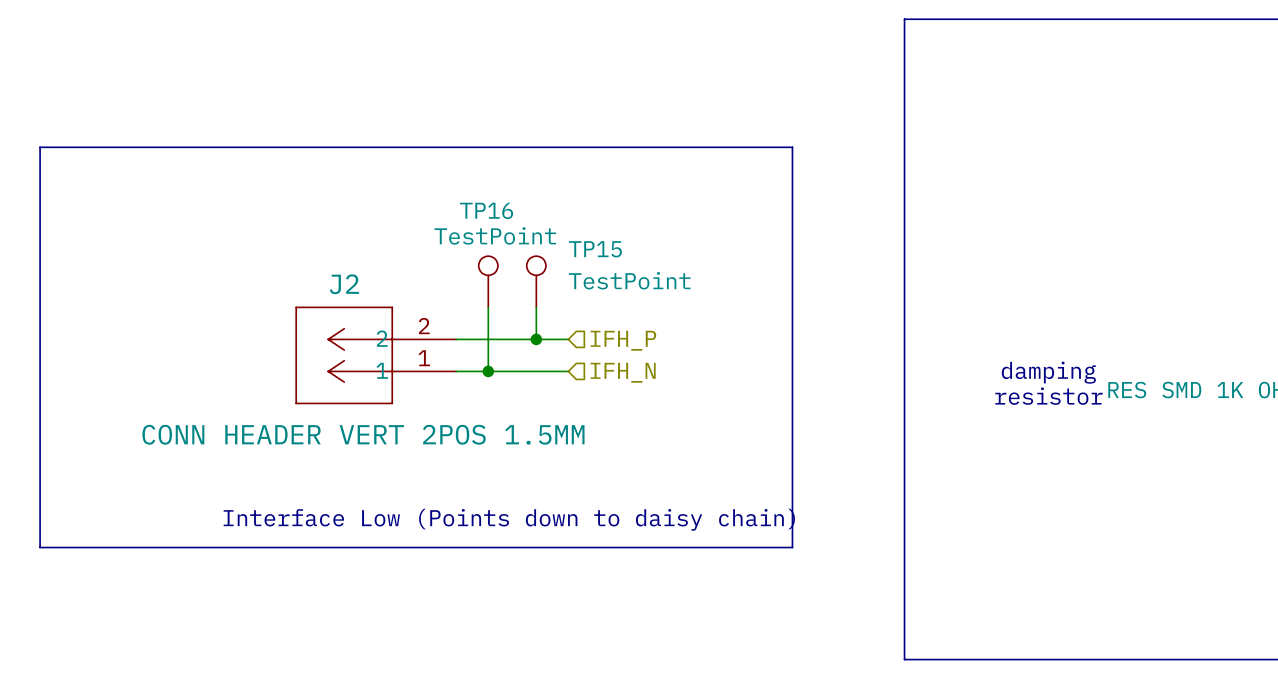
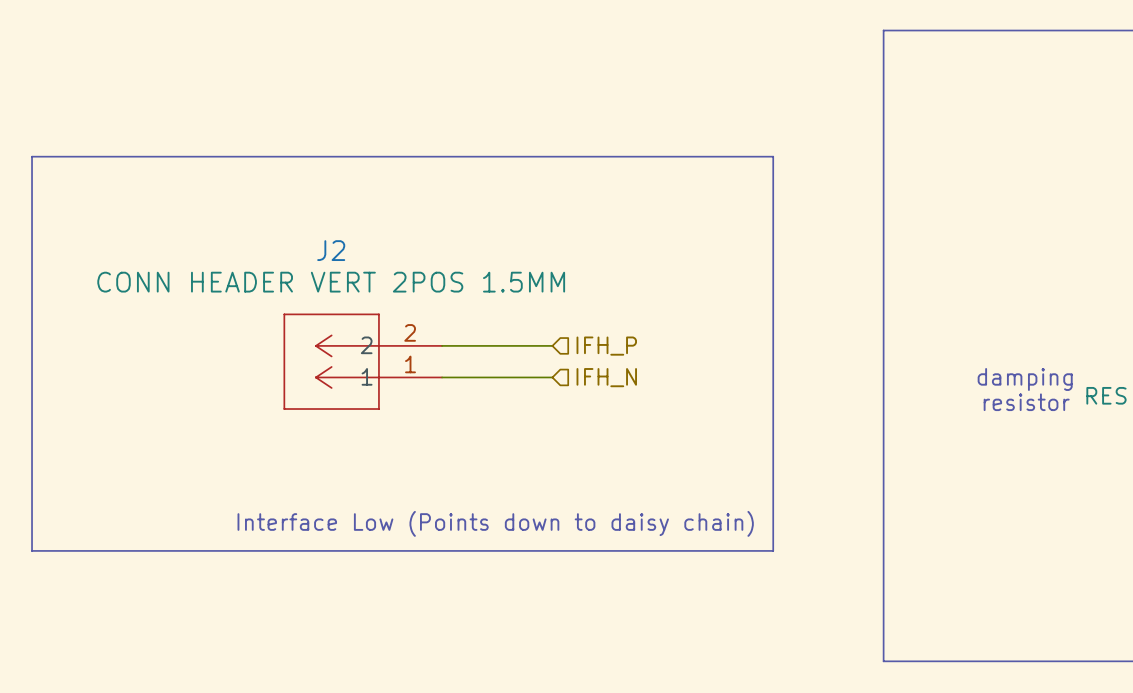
TP16: TestPoint (488, 281) -> none
TP15: TestPoint (536, 281) -> none
J2 name position: J2 (344, 284) -> J2 (331, 250)
wire: (488, 307) (488, 371) -> none
wire: (536, 307) (536, 339) -> none
junction: (536, 339) -> none
junction: (488, 371) -> none
J2 value position: CONN HEADER VERT 2POS 1.5MM (363, 434) -> CONN HEADER VERT 2POS 1.5MM (331, 282)

